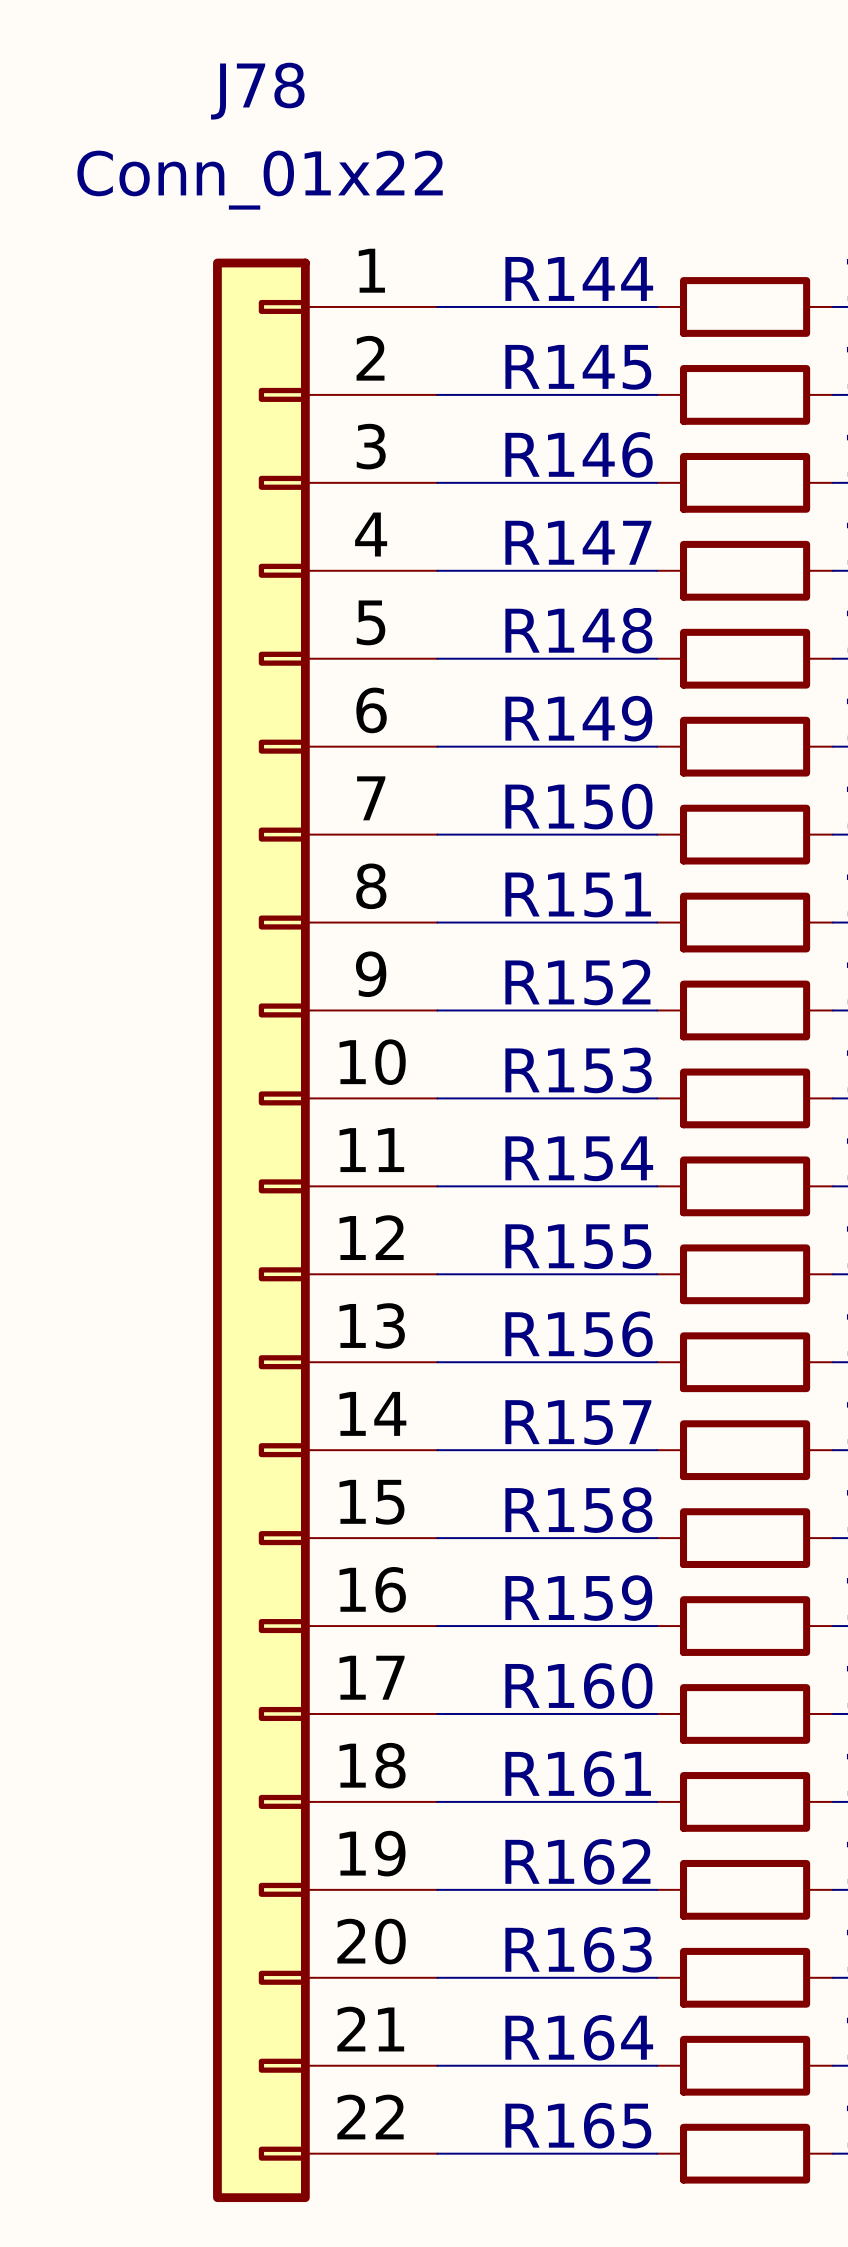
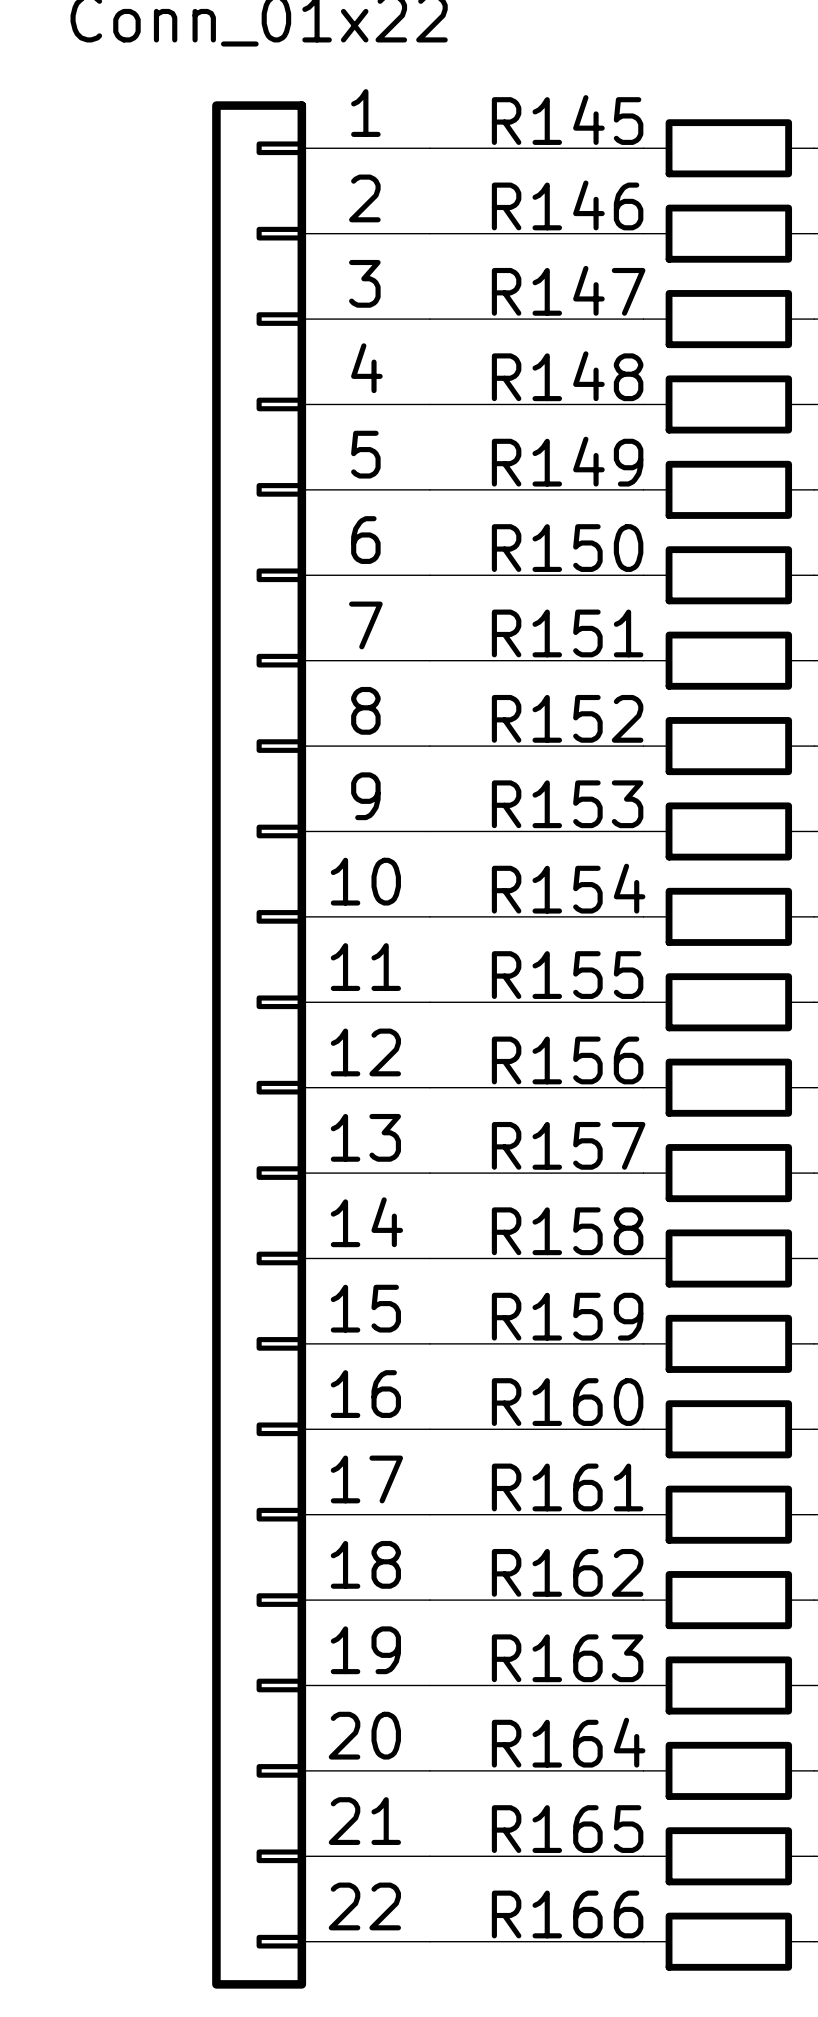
R144 name: R144 (579, 278) -> R145 (567, 120)
R145 name: R145 (578, 367) -> R146 (567, 205)
R146 name: R146 (579, 454) -> R147 (568, 290)
R147 name: R147 (578, 542) -> R148 (567, 376)
R148 name: R148 (578, 630) -> R149 (567, 461)
R149 name: R149 (578, 718) -> R150 (567, 548)
R150 name: R150 (578, 806) -> R151 (567, 633)
R151 name: R151 (578, 894) -> R152 (567, 718)
R152 name: R152 (577, 982) -> R153 (567, 804)
R153 name: R153 (578, 1070) -> R154 (568, 888)
R154 name: R154 (579, 1158) -> R155 (567, 975)
R155 name: R155 (578, 1246) -> R156 (567, 1060)
R156 name: R156 (579, 1334) -> R157 (568, 1145)
R157 name: R157 (578, 1422) -> R158 (567, 1231)
R158 name: R158 (578, 1510) -> R159 (567, 1316)
R159 name: R159 (578, 1598) -> R160 (567, 1402)
R160 name: R160 (578, 1685) -> R161 (567, 1487)
R161 name: R161 (578, 1773) -> R162 (567, 1572)
R162 name: R162 (577, 1861) -> R163 (567, 1658)
R163 name: R163 (578, 1949) -> R164 (568, 1742)
R164 name: R164 (579, 2037) -> R165 (567, 1829)
R165 name: R165 (578, 2125) -> R166 (567, 1914)

